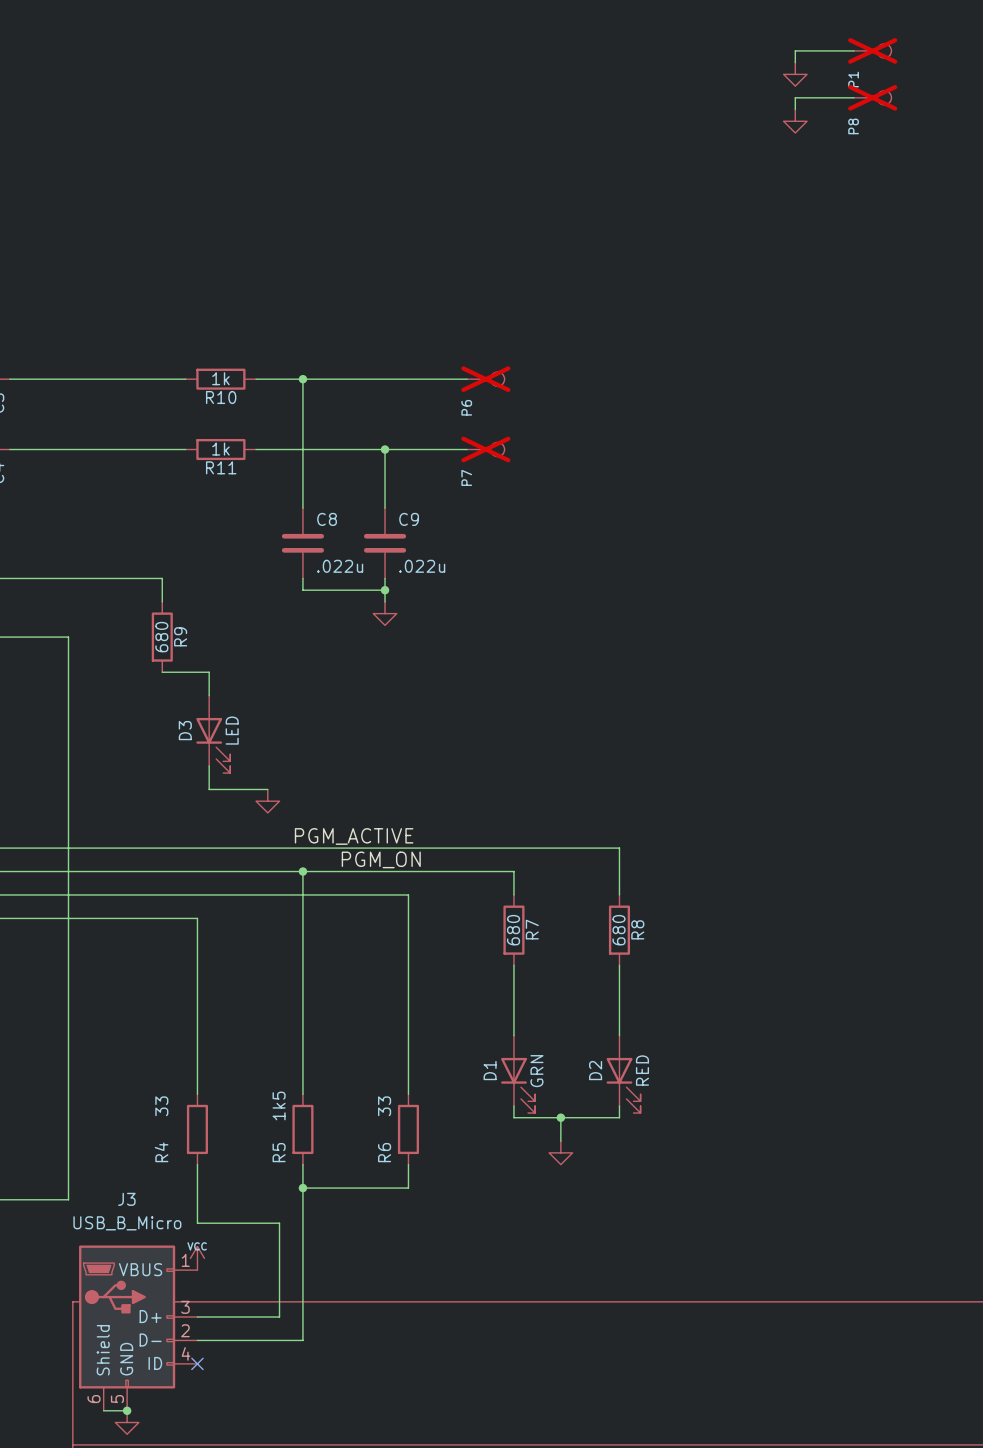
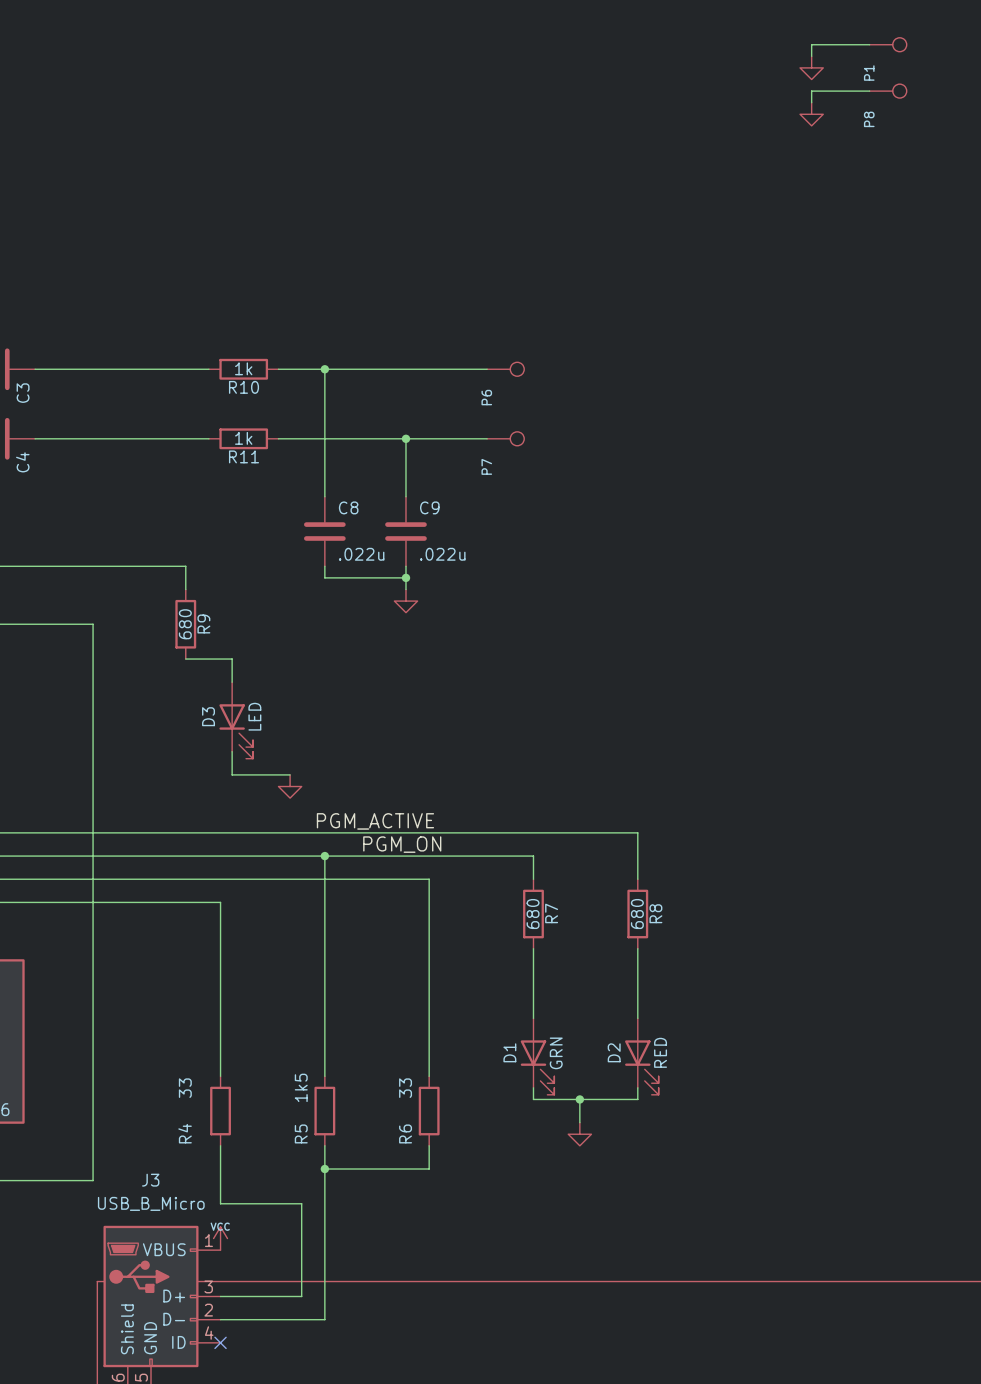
P1 do-not-place cross: (872, 50) -> none
P8 do-not-place cross: (872, 97) -> none
P6 do-not-place cross: (485, 379) -> none
P7 do-not-place cross: (485, 449) -> none

